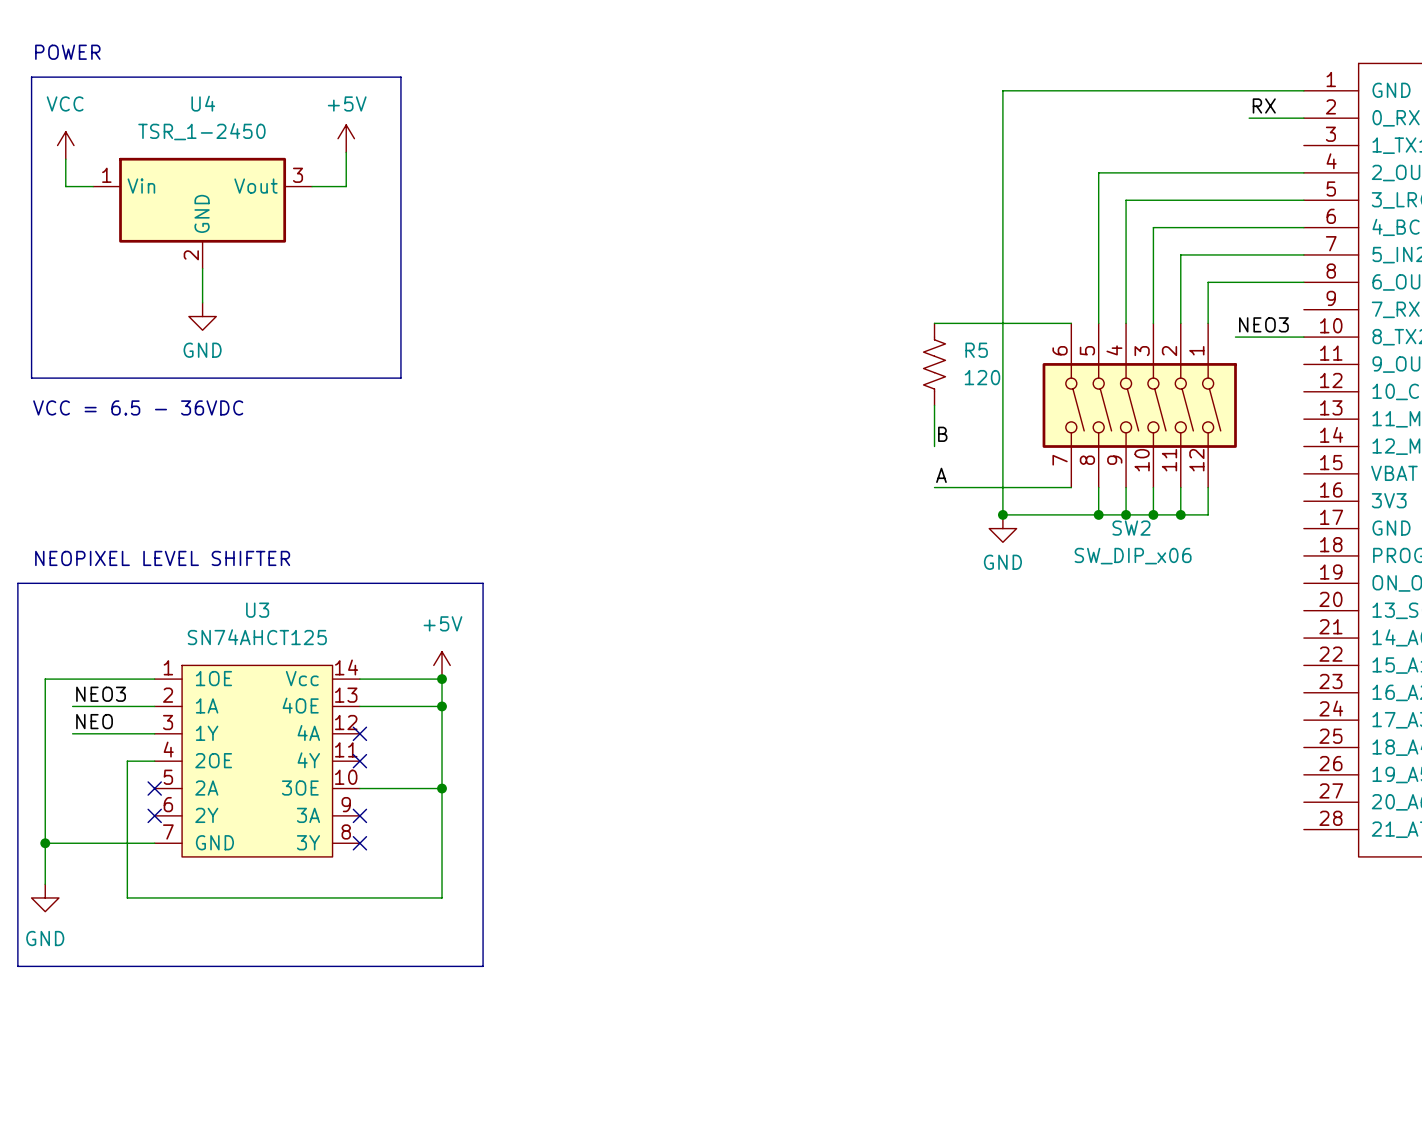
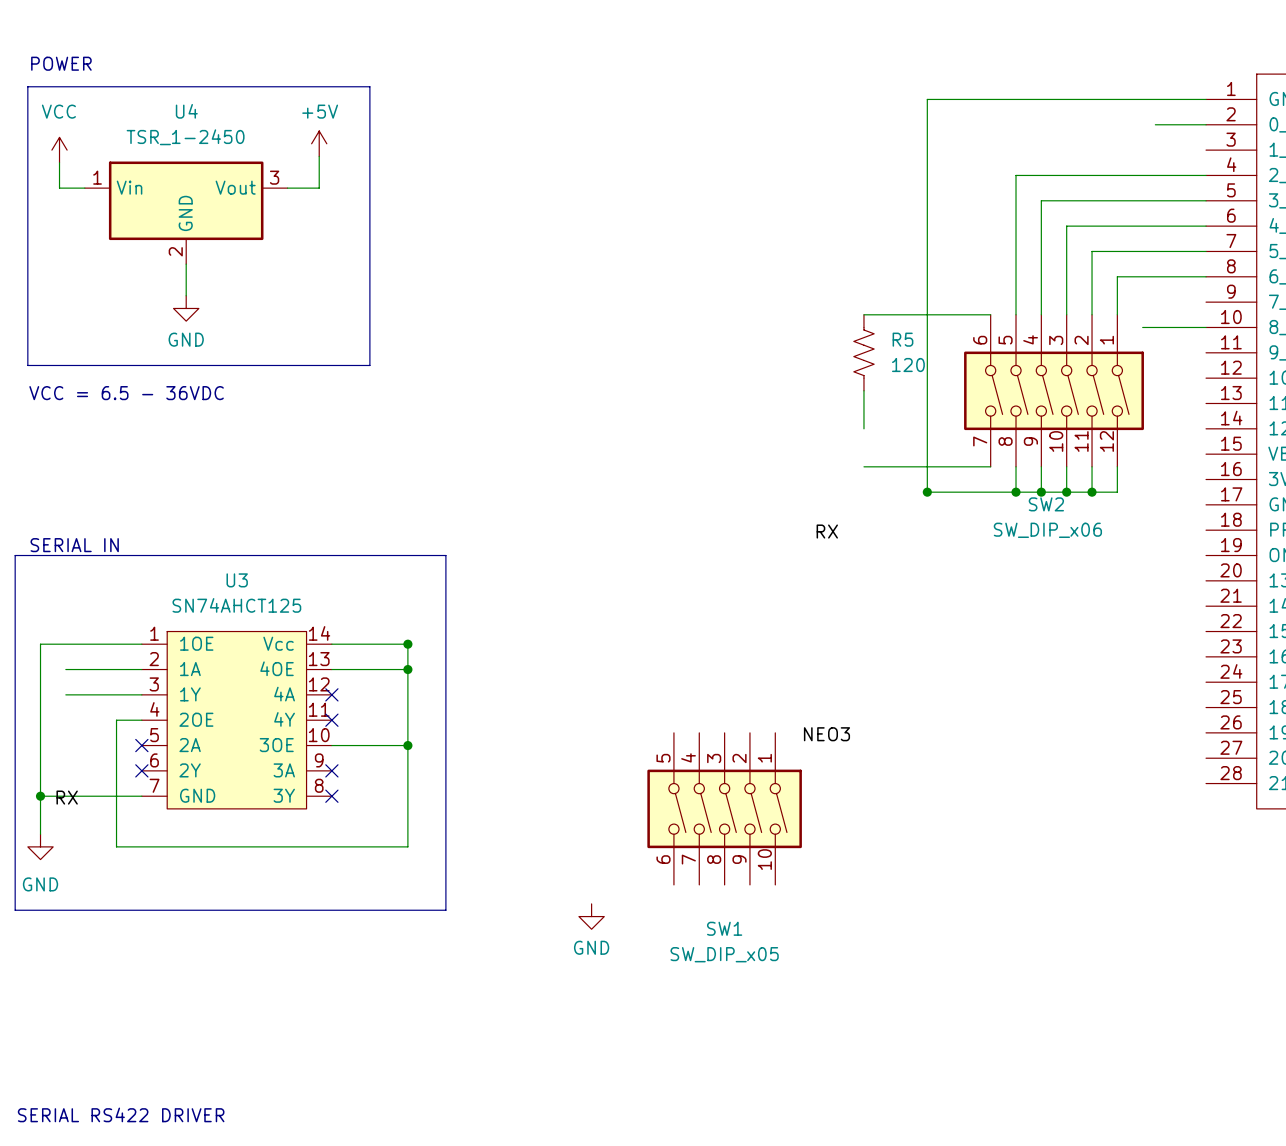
label: RX (1264, 105) -> none
label: NEO3 (1263, 324) -> none
label: B (942, 434) -> none
label: A (941, 475) -> none
power symbol: GND (1002, 528) -> none
label: none -> RX (827, 531)
text: NEOPIXEL LEVEL SHIFTER (162, 558) -> none
text: none -> SERIAL IN (74, 545)
power symbol: +5V (442, 665) -> none
label: NEO3 (101, 694) -> none
label: NEO (94, 721) -> none
label: none -> NEO3 (826, 734)
label: none -> RX (67, 797)
SW1: none -> SW_DIP_x05 (724, 808)
power symbol: none -> GND (591, 916)

